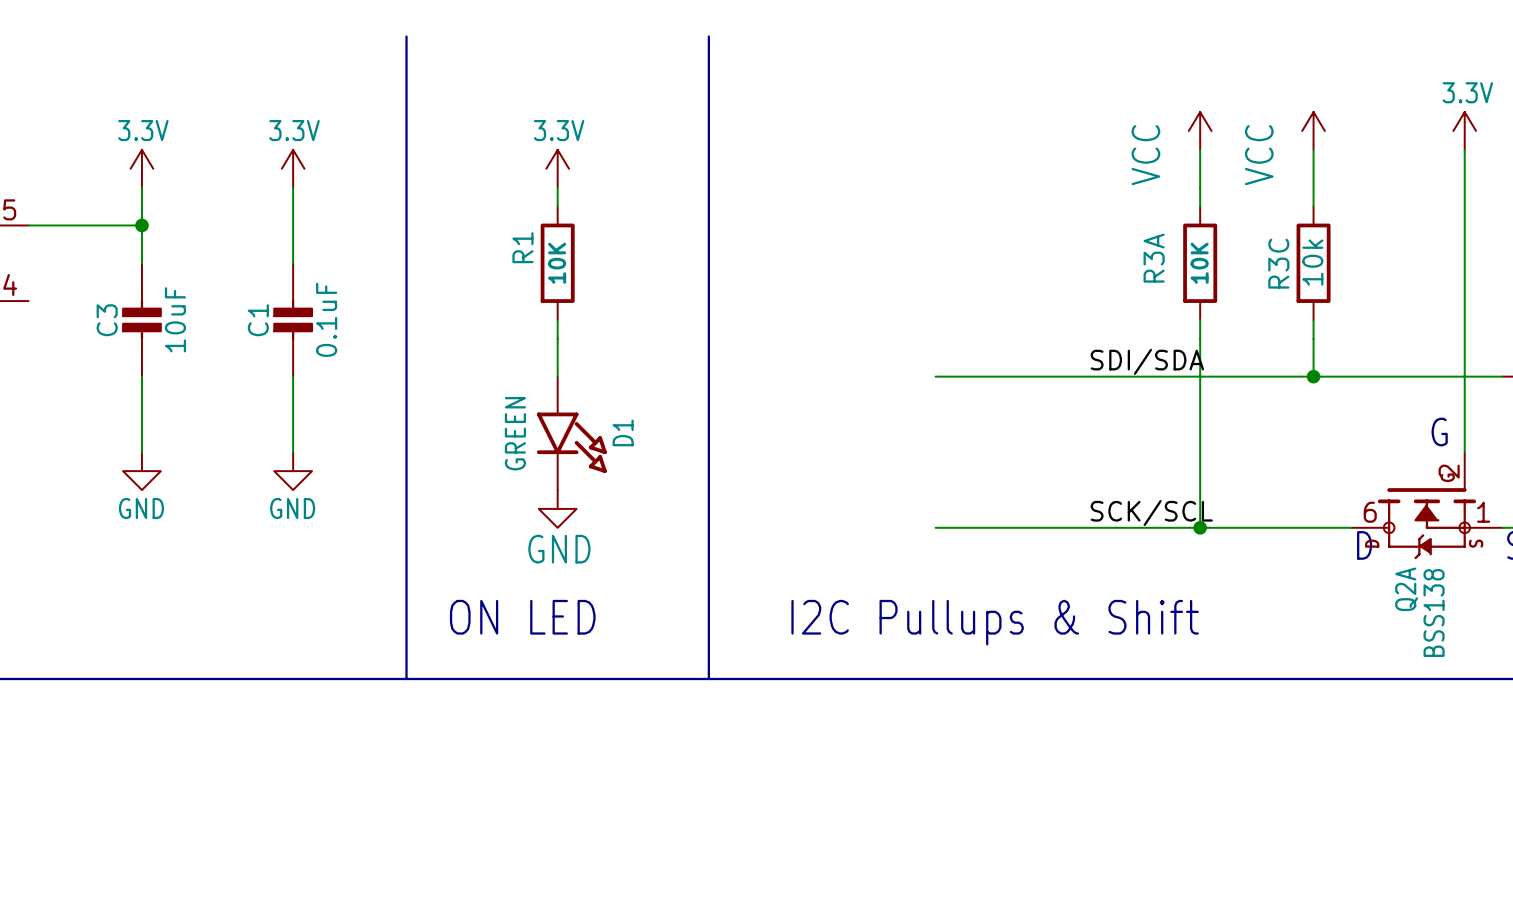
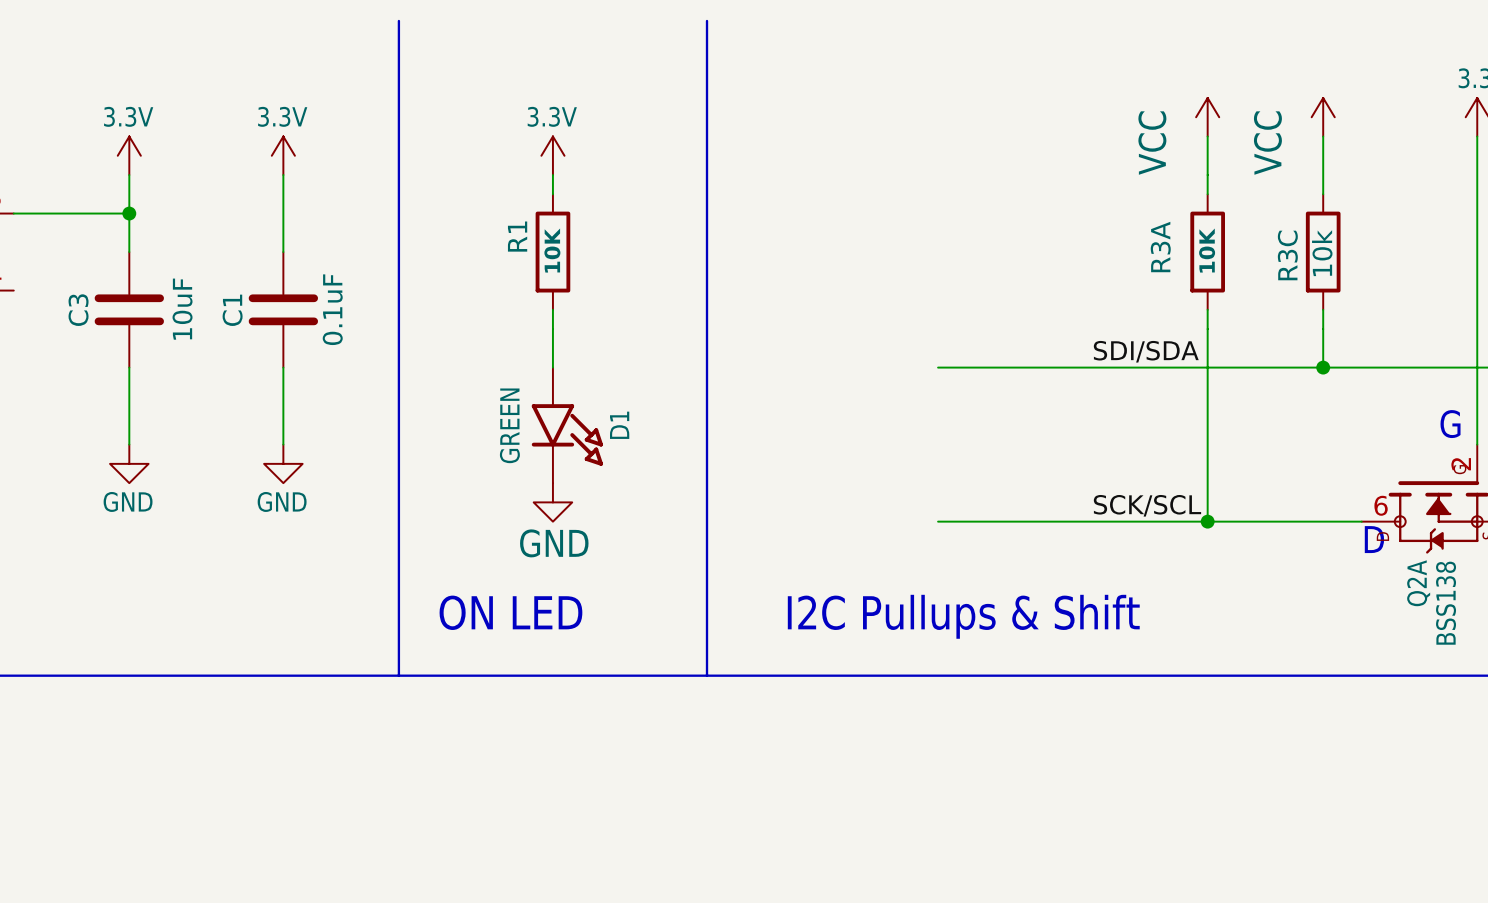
C3 symbol: [123, 263, 161, 377] -> [94, 252, 164, 368]
C1 symbol: [274, 263, 313, 377] -> [248, 252, 319, 368]
C3 value position: 10uF (175, 319) -> 10uF (182, 309)
C1 value position: 0.1uF (326, 319) -> 0.1uF (332, 309)
C3 name position: C3 (107, 320) -> C3 (78, 310)
C1 name position: C1 (258, 320) -> C1 (232, 310)

